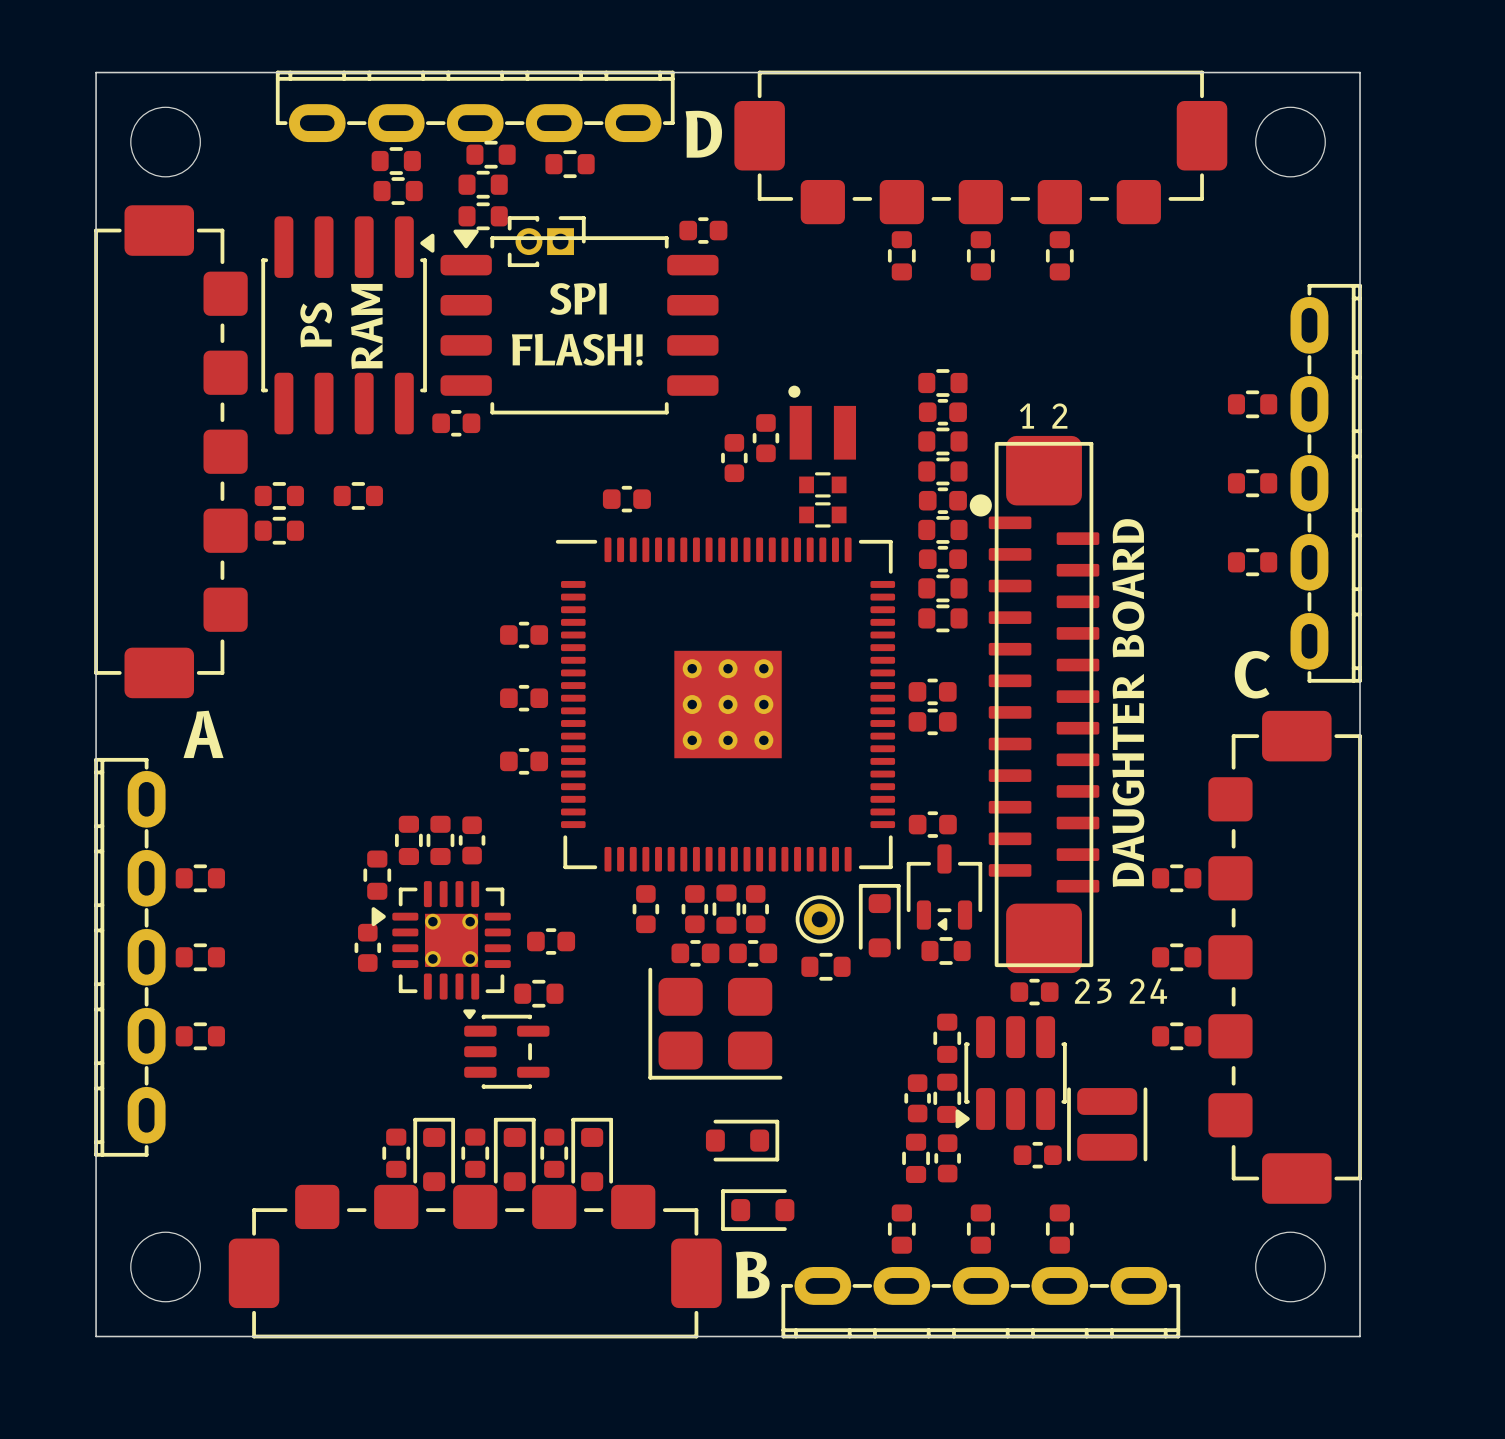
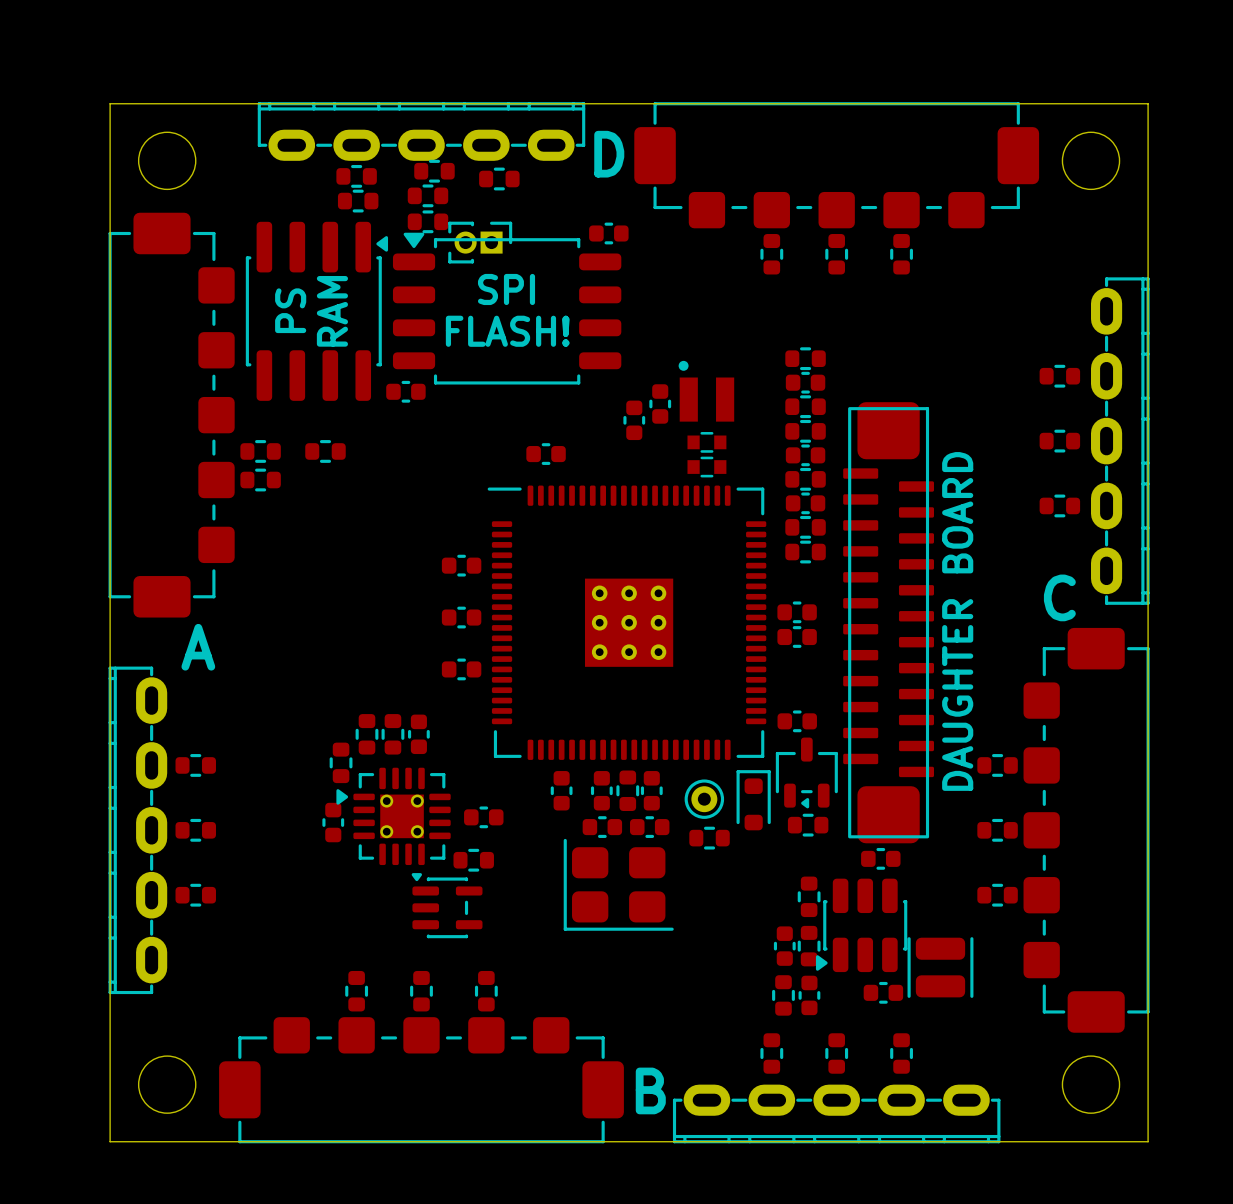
text: 1 2 (1043, 416) -> none
part footprint: [969, 435, 1100, 974] -> [843, 402, 935, 844]
text: 23 24 (1121, 991) -> none
part: (742, 1140) -> none
part: (434, 1154) -> none
part: (514, 1154) -> none
part: (592, 1154) -> none
part: (757, 1210) -> none

